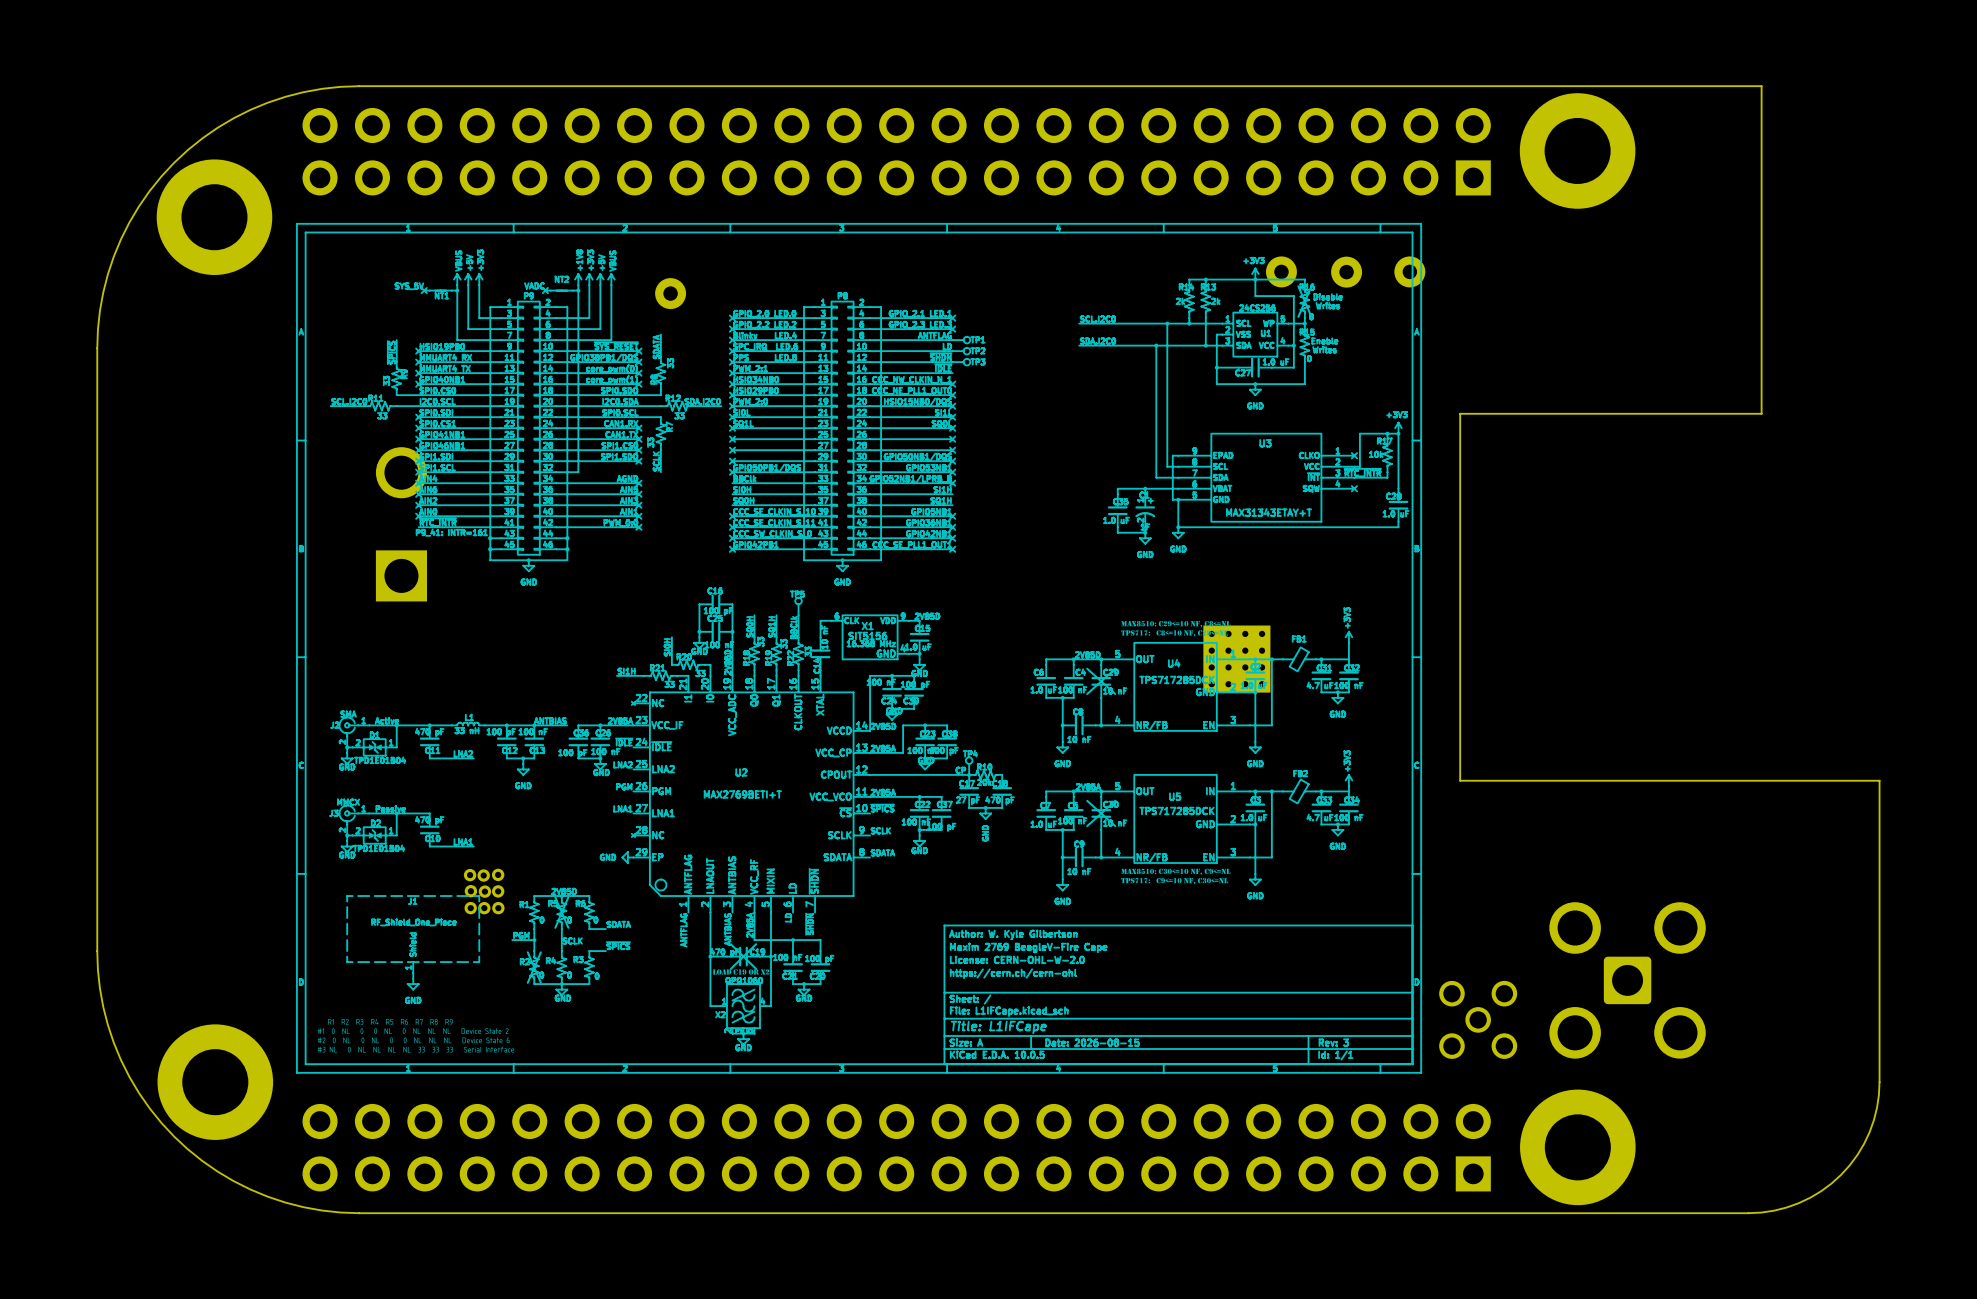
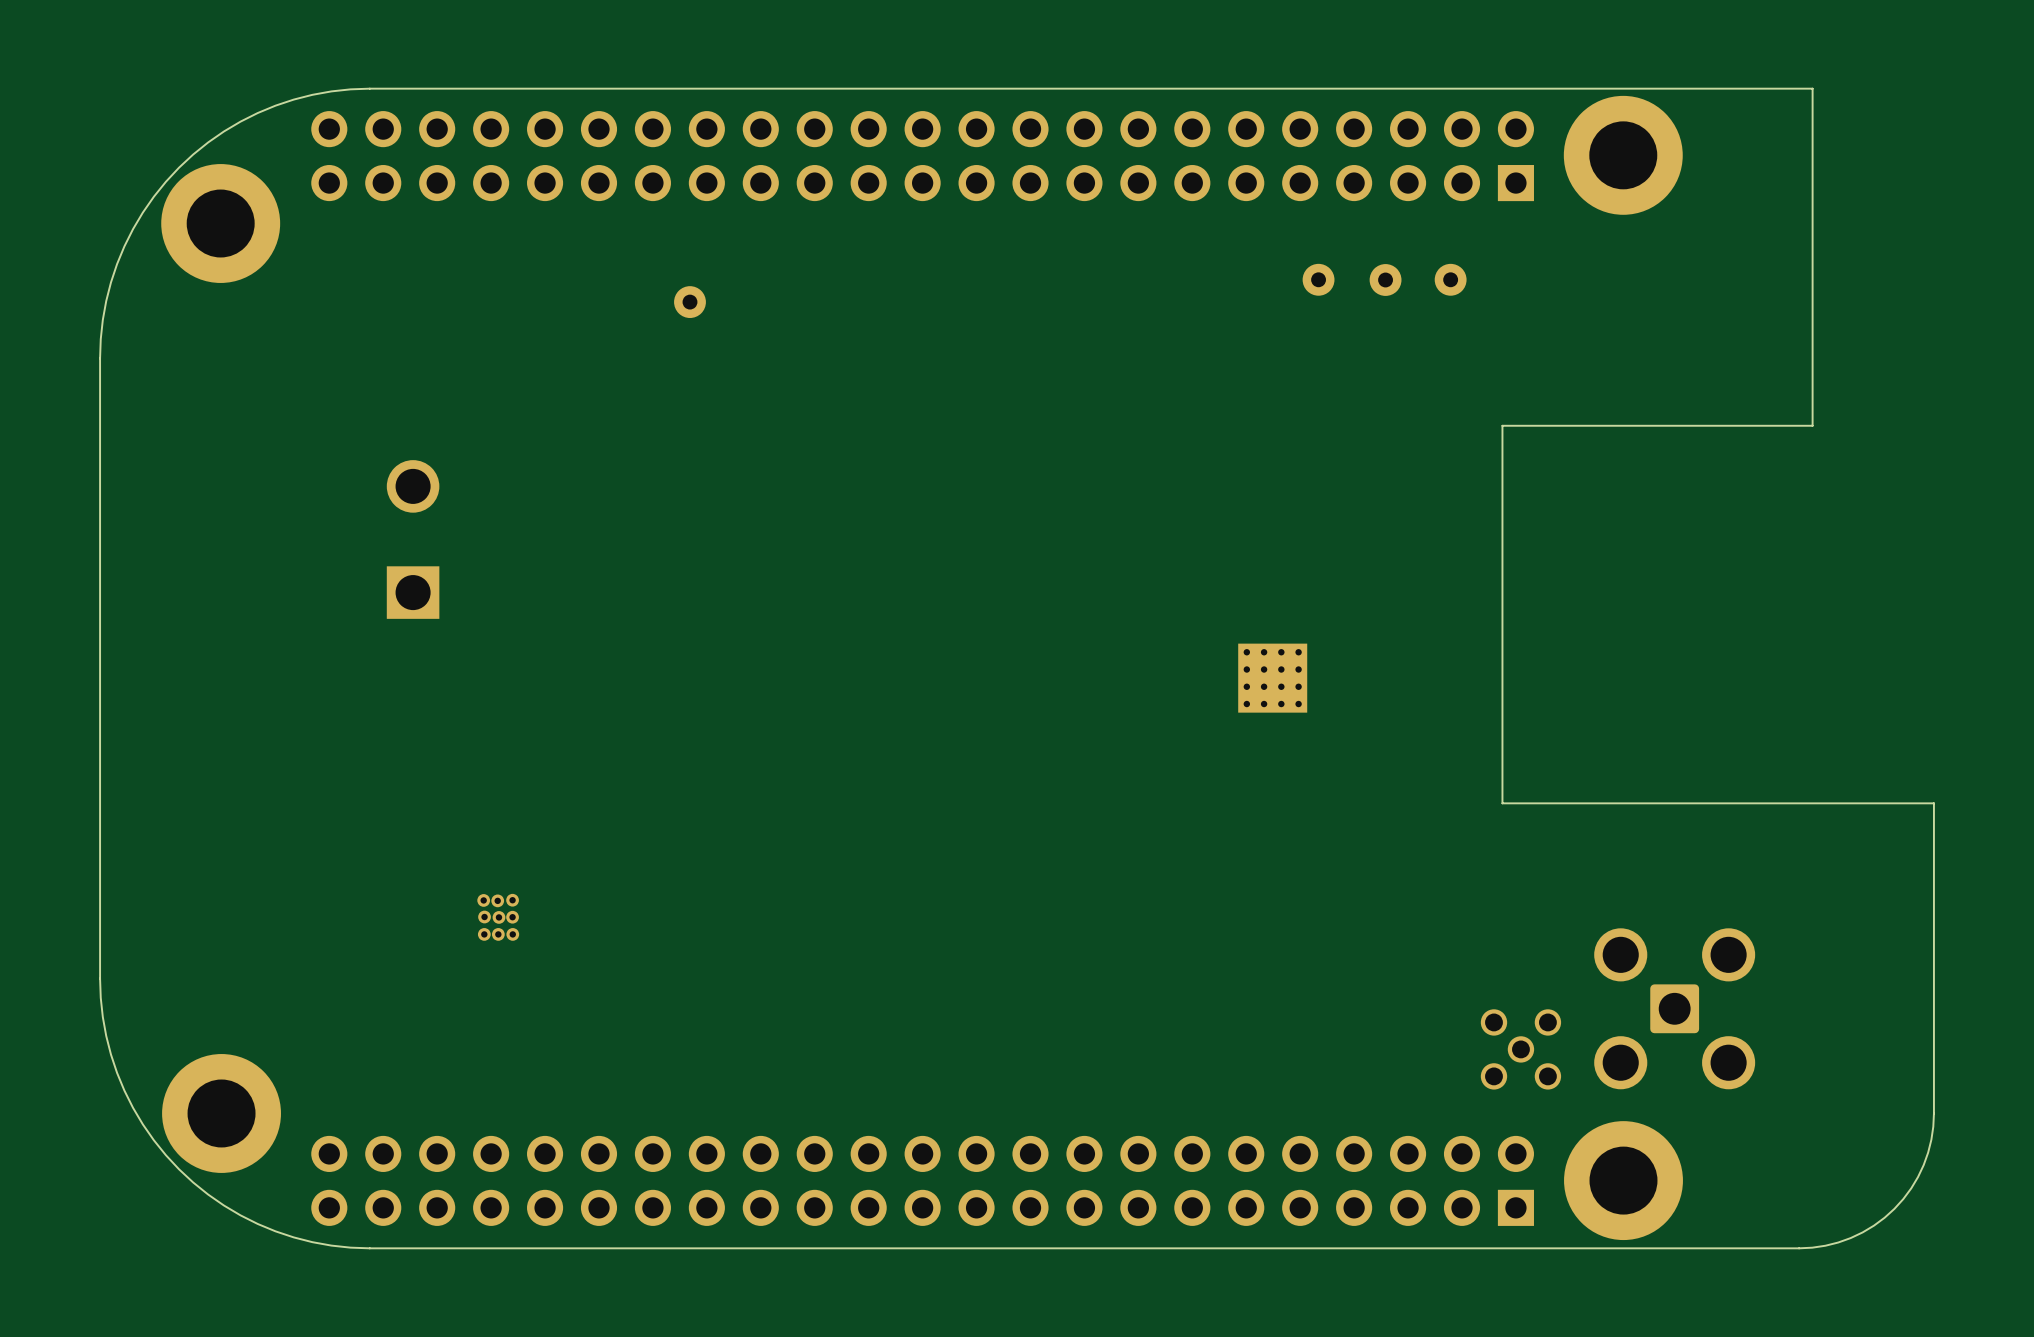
drawing: [296, 223, 1422, 1074] -> none

